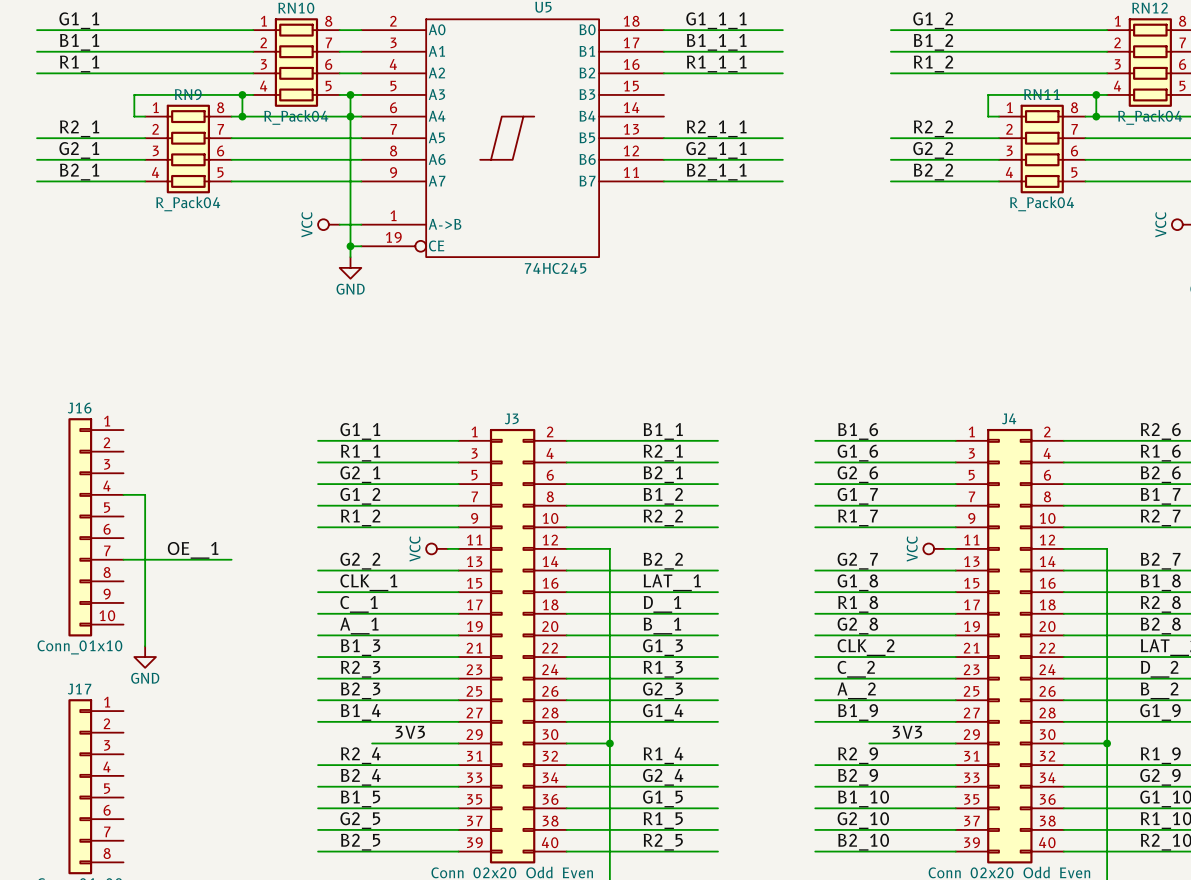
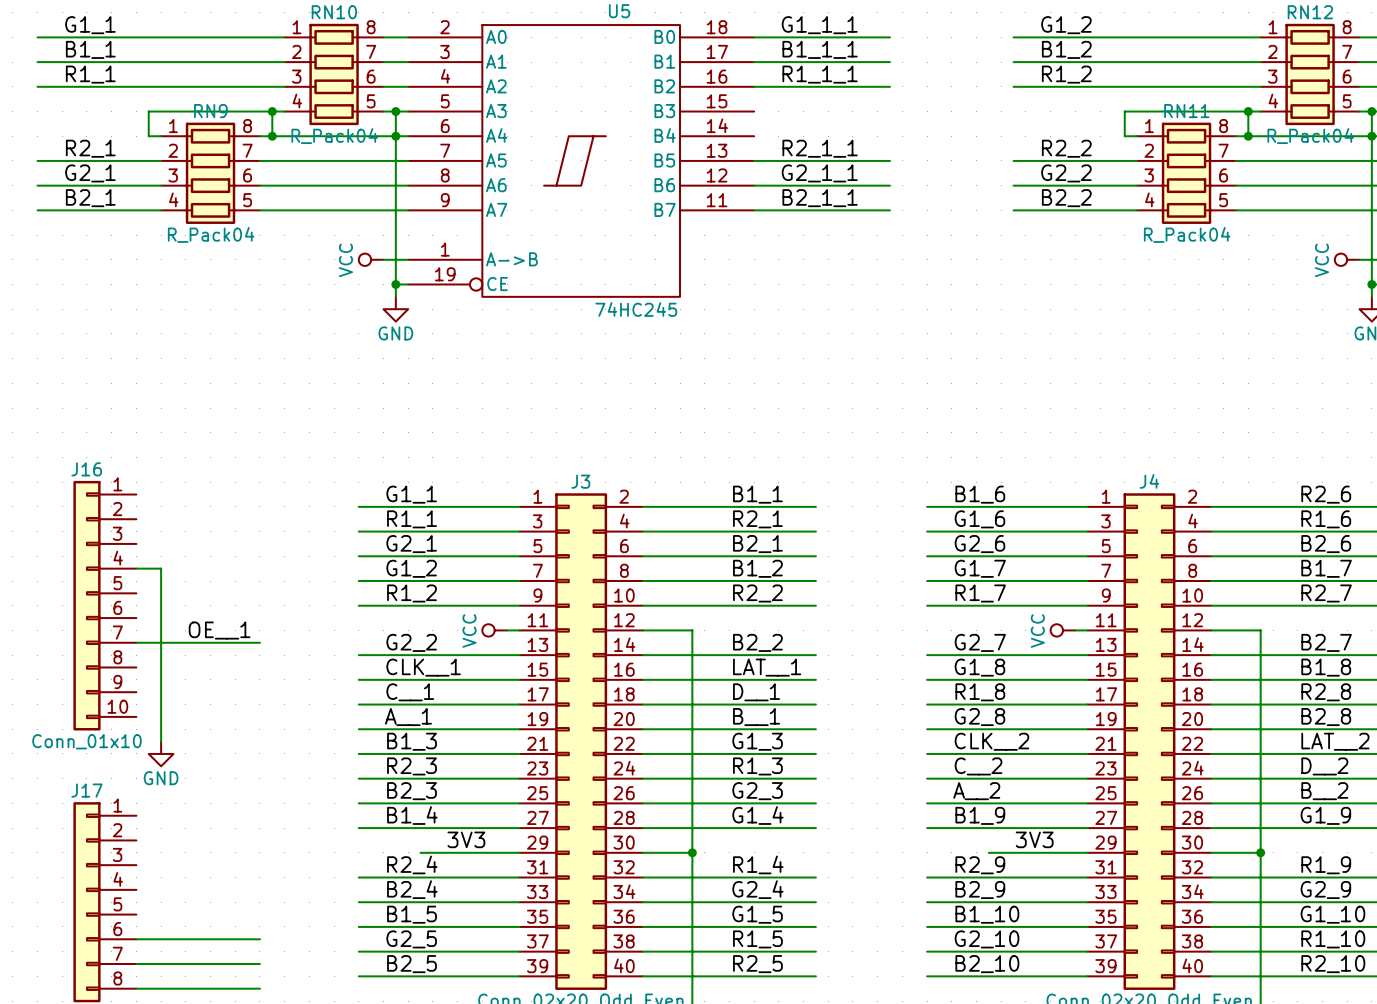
wire: none -> (136, 939) (259, 939)
wire: none -> (136, 963) (259, 963)
wire: none -> (136, 988) (259, 988)

